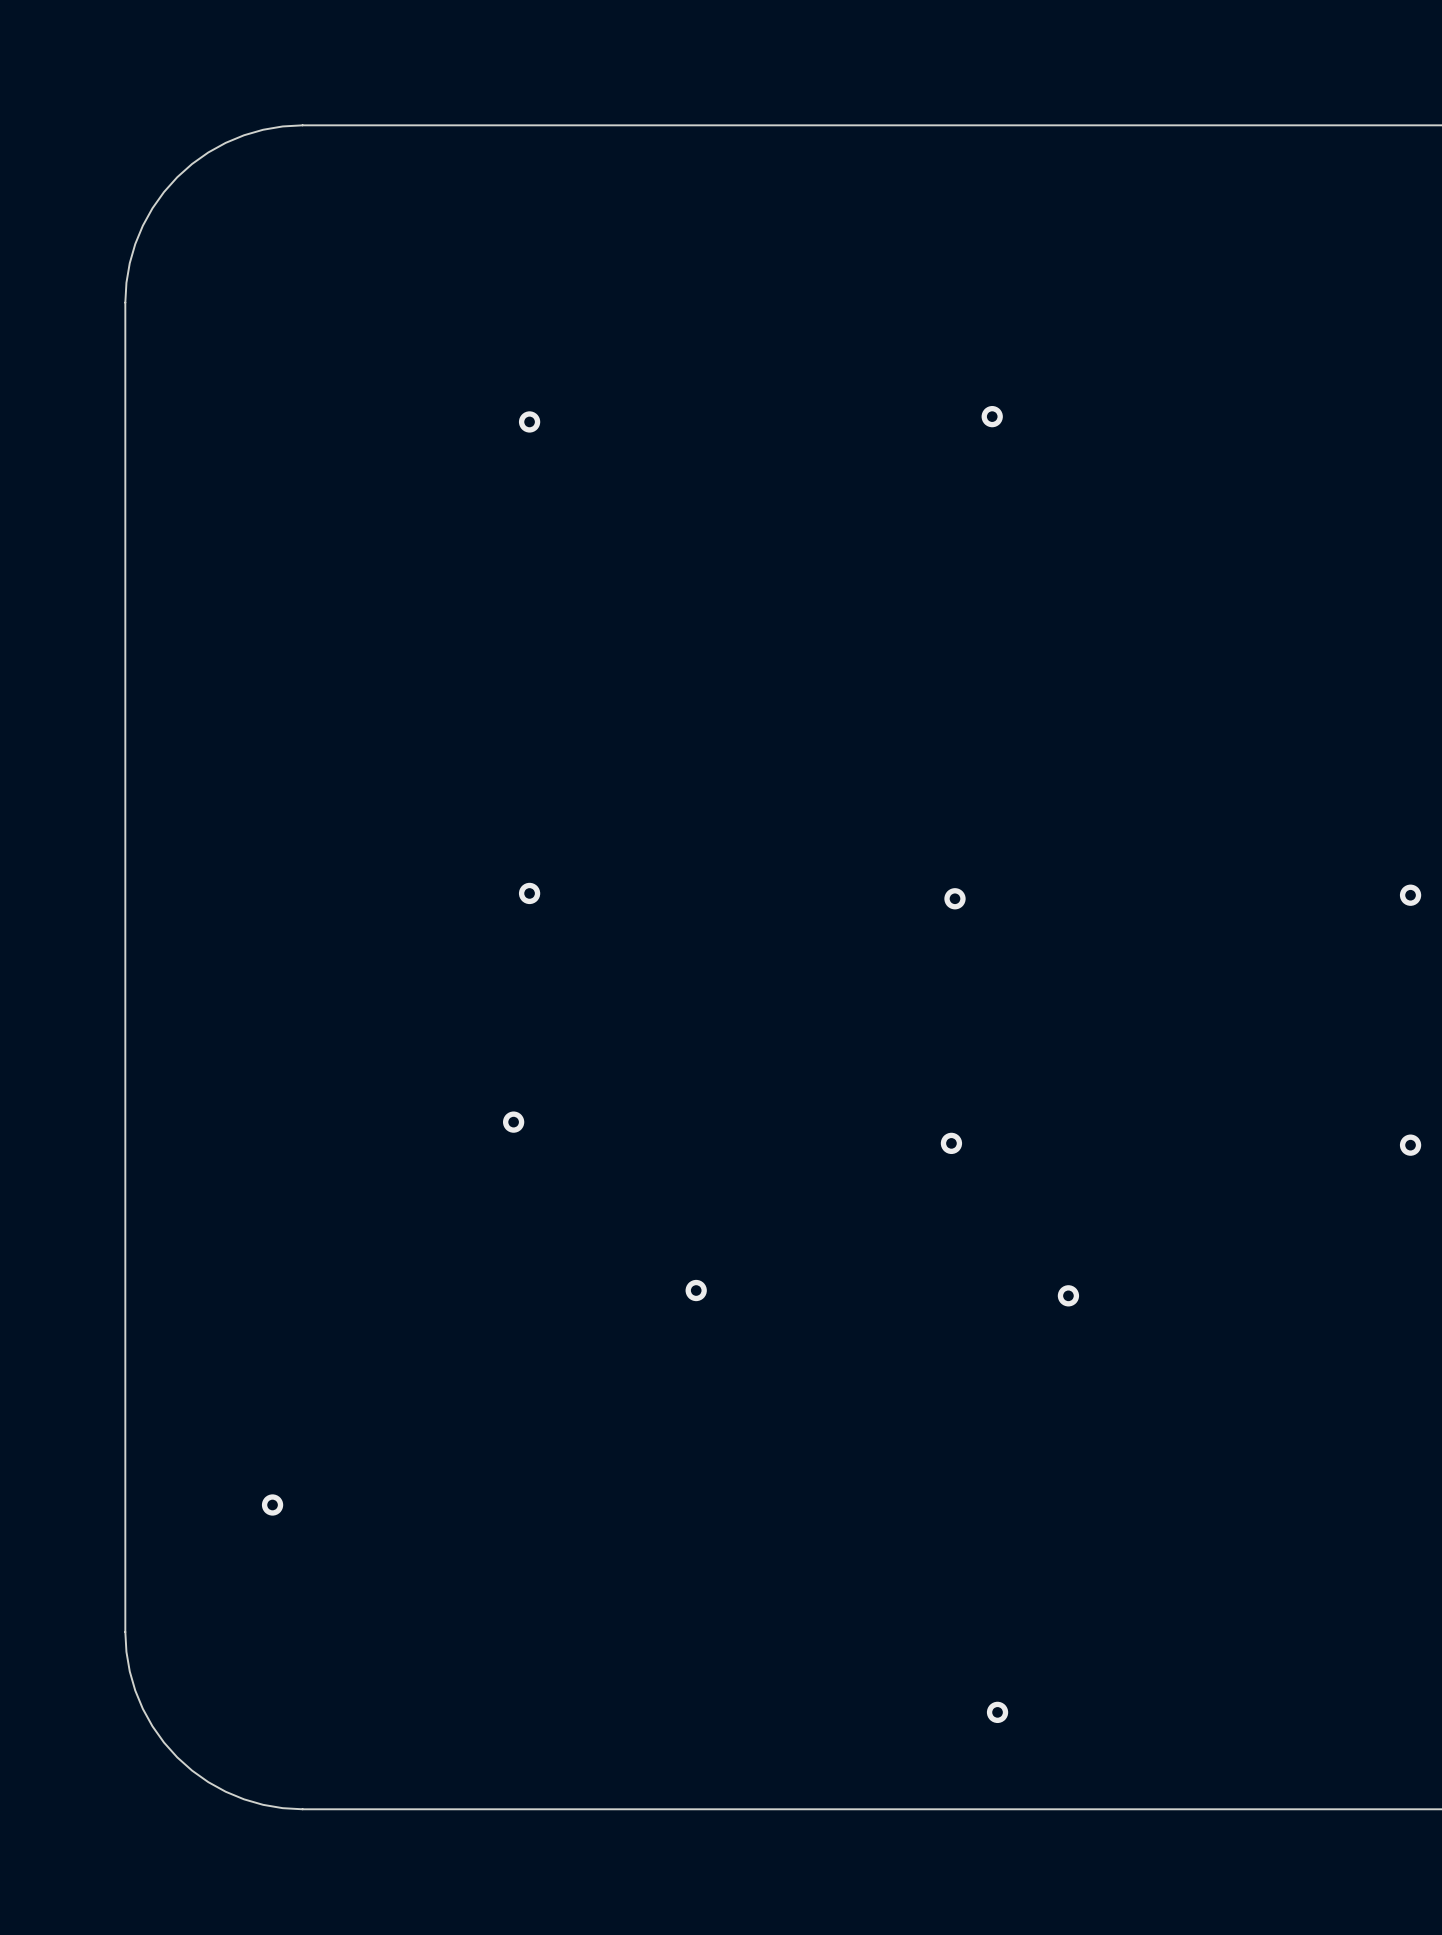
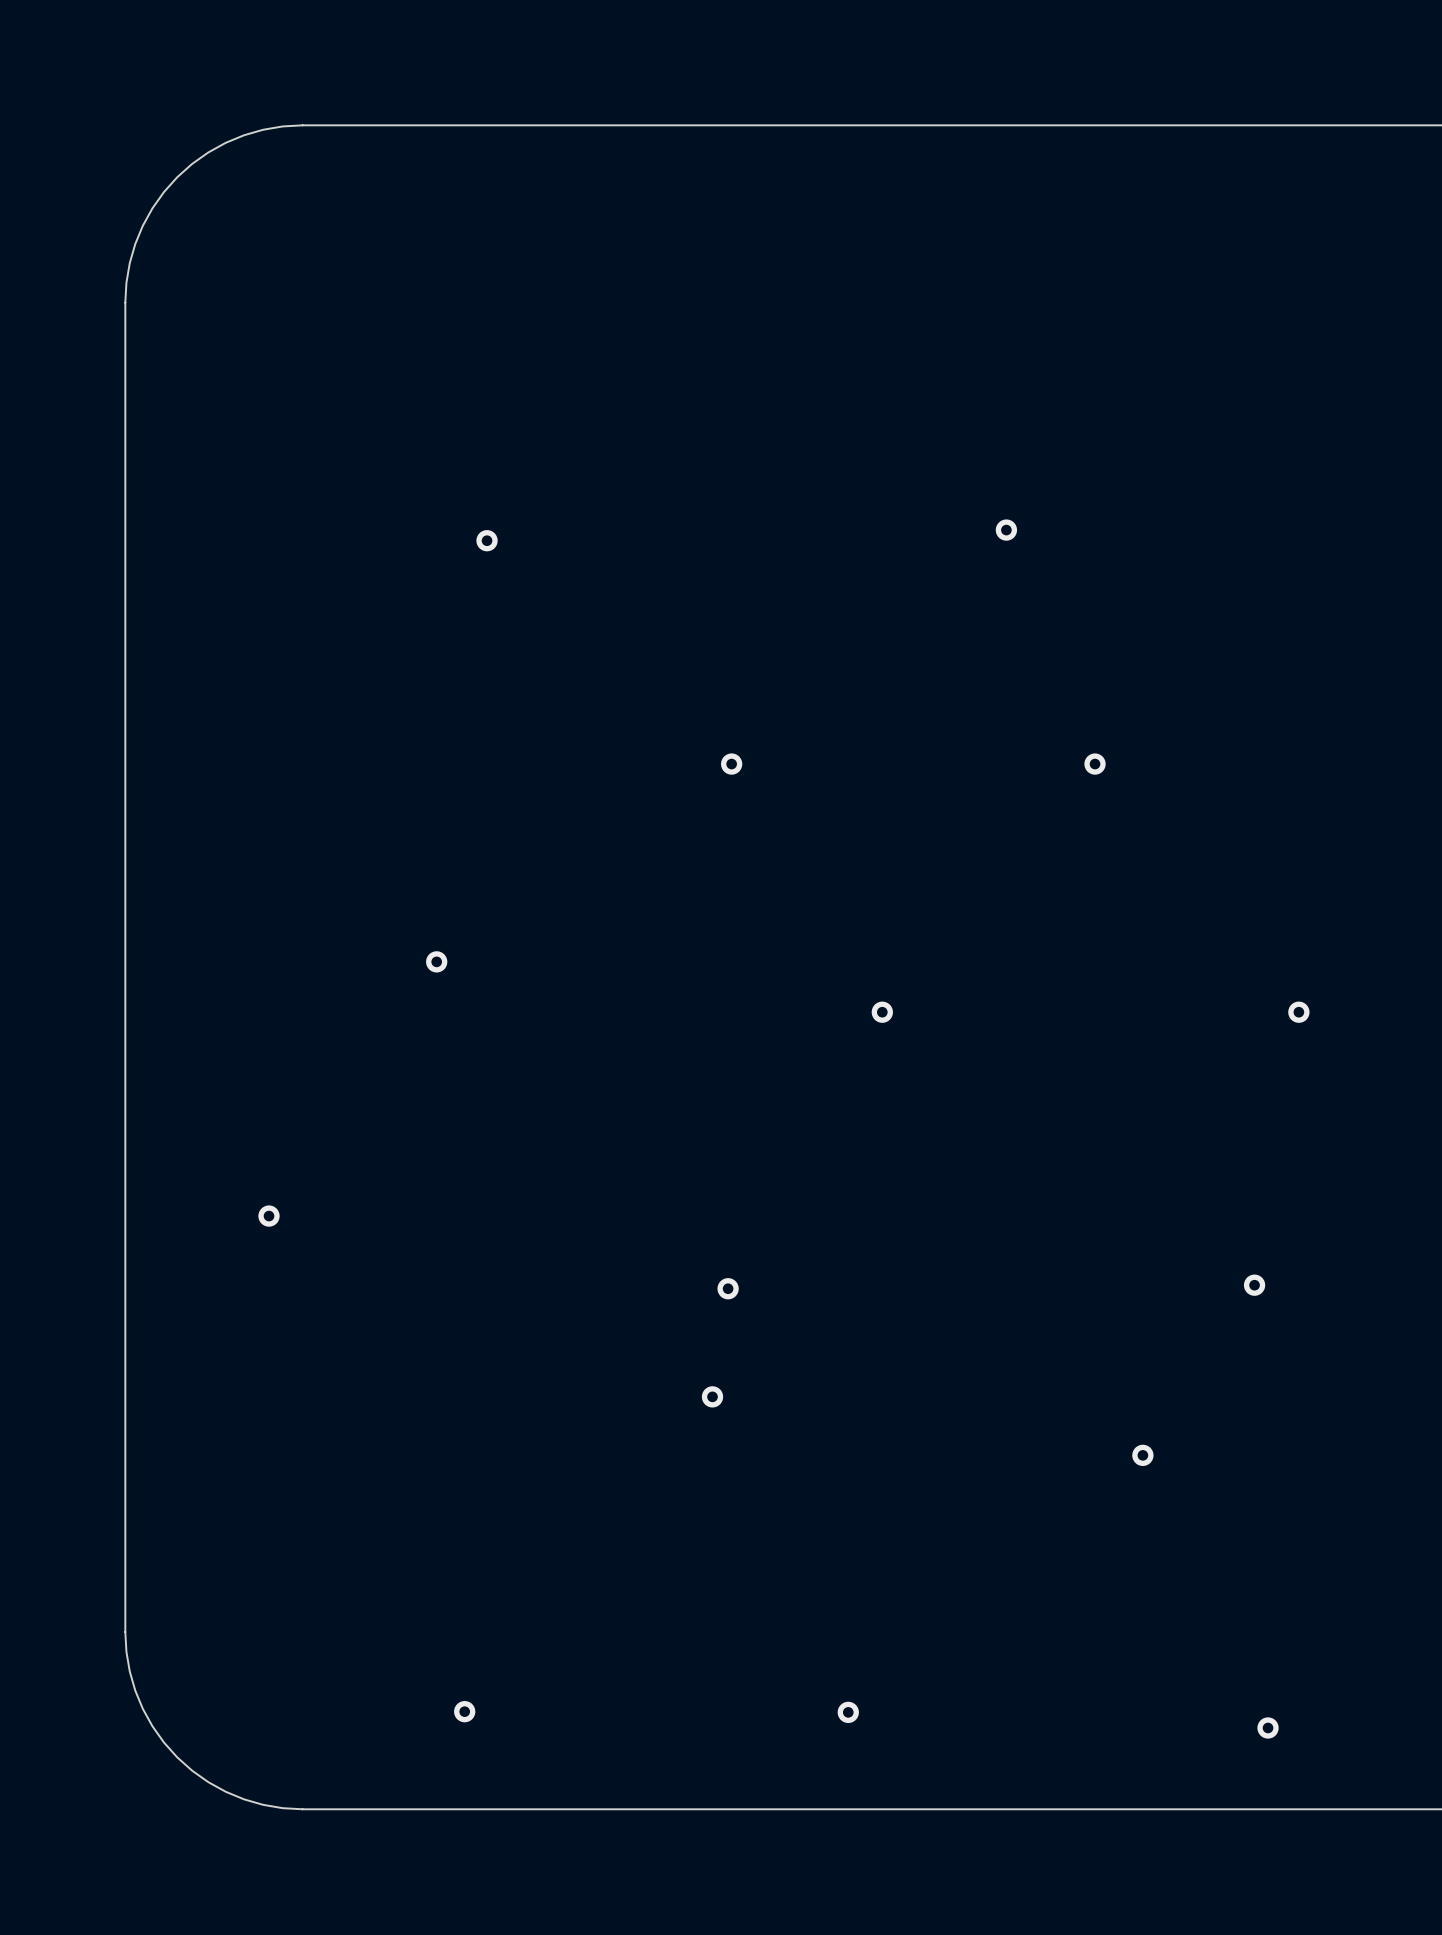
via position: (992, 416) -> (1006, 530)
via position: (529, 421) -> (487, 540)
via: none -> (731, 764)
via: none -> (1095, 764)
via: (529, 893) -> none
via: (1410, 895) -> none
via: (954, 898) -> none
via: none -> (436, 961)
via: none -> (882, 1012)
via: none -> (1298, 1012)
via: (513, 1122) -> none
via: (951, 1143) -> none
via: (1410, 1145) -> none
via: none -> (269, 1216)
via: none -> (1254, 1285)
via position: (696, 1290) -> (728, 1288)
via: (1068, 1295) -> none
via: none -> (712, 1396)
via: none -> (1142, 1455)
via: (272, 1504) -> none
via: none -> (464, 1711)
via: none -> (848, 1712)
via: (997, 1712) -> none
via: none -> (1268, 1727)

